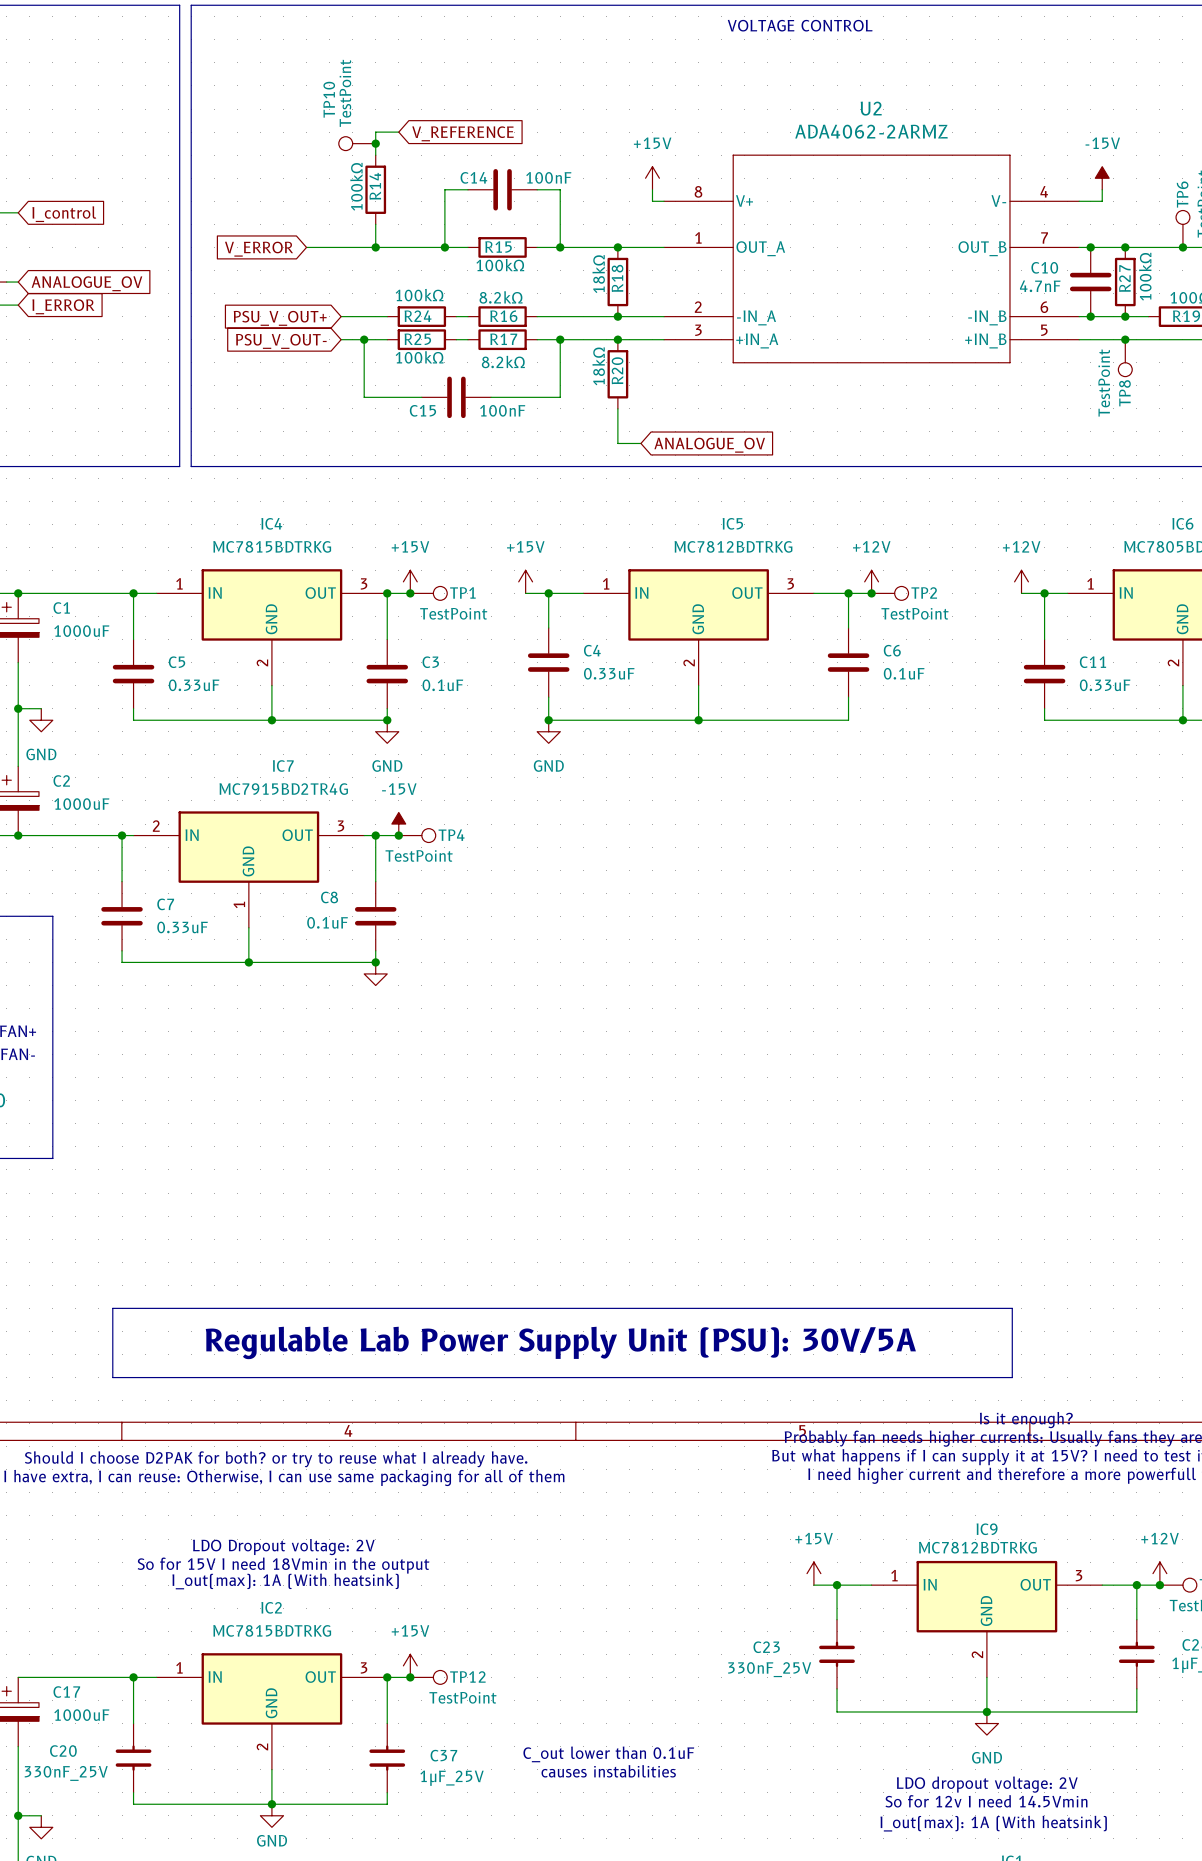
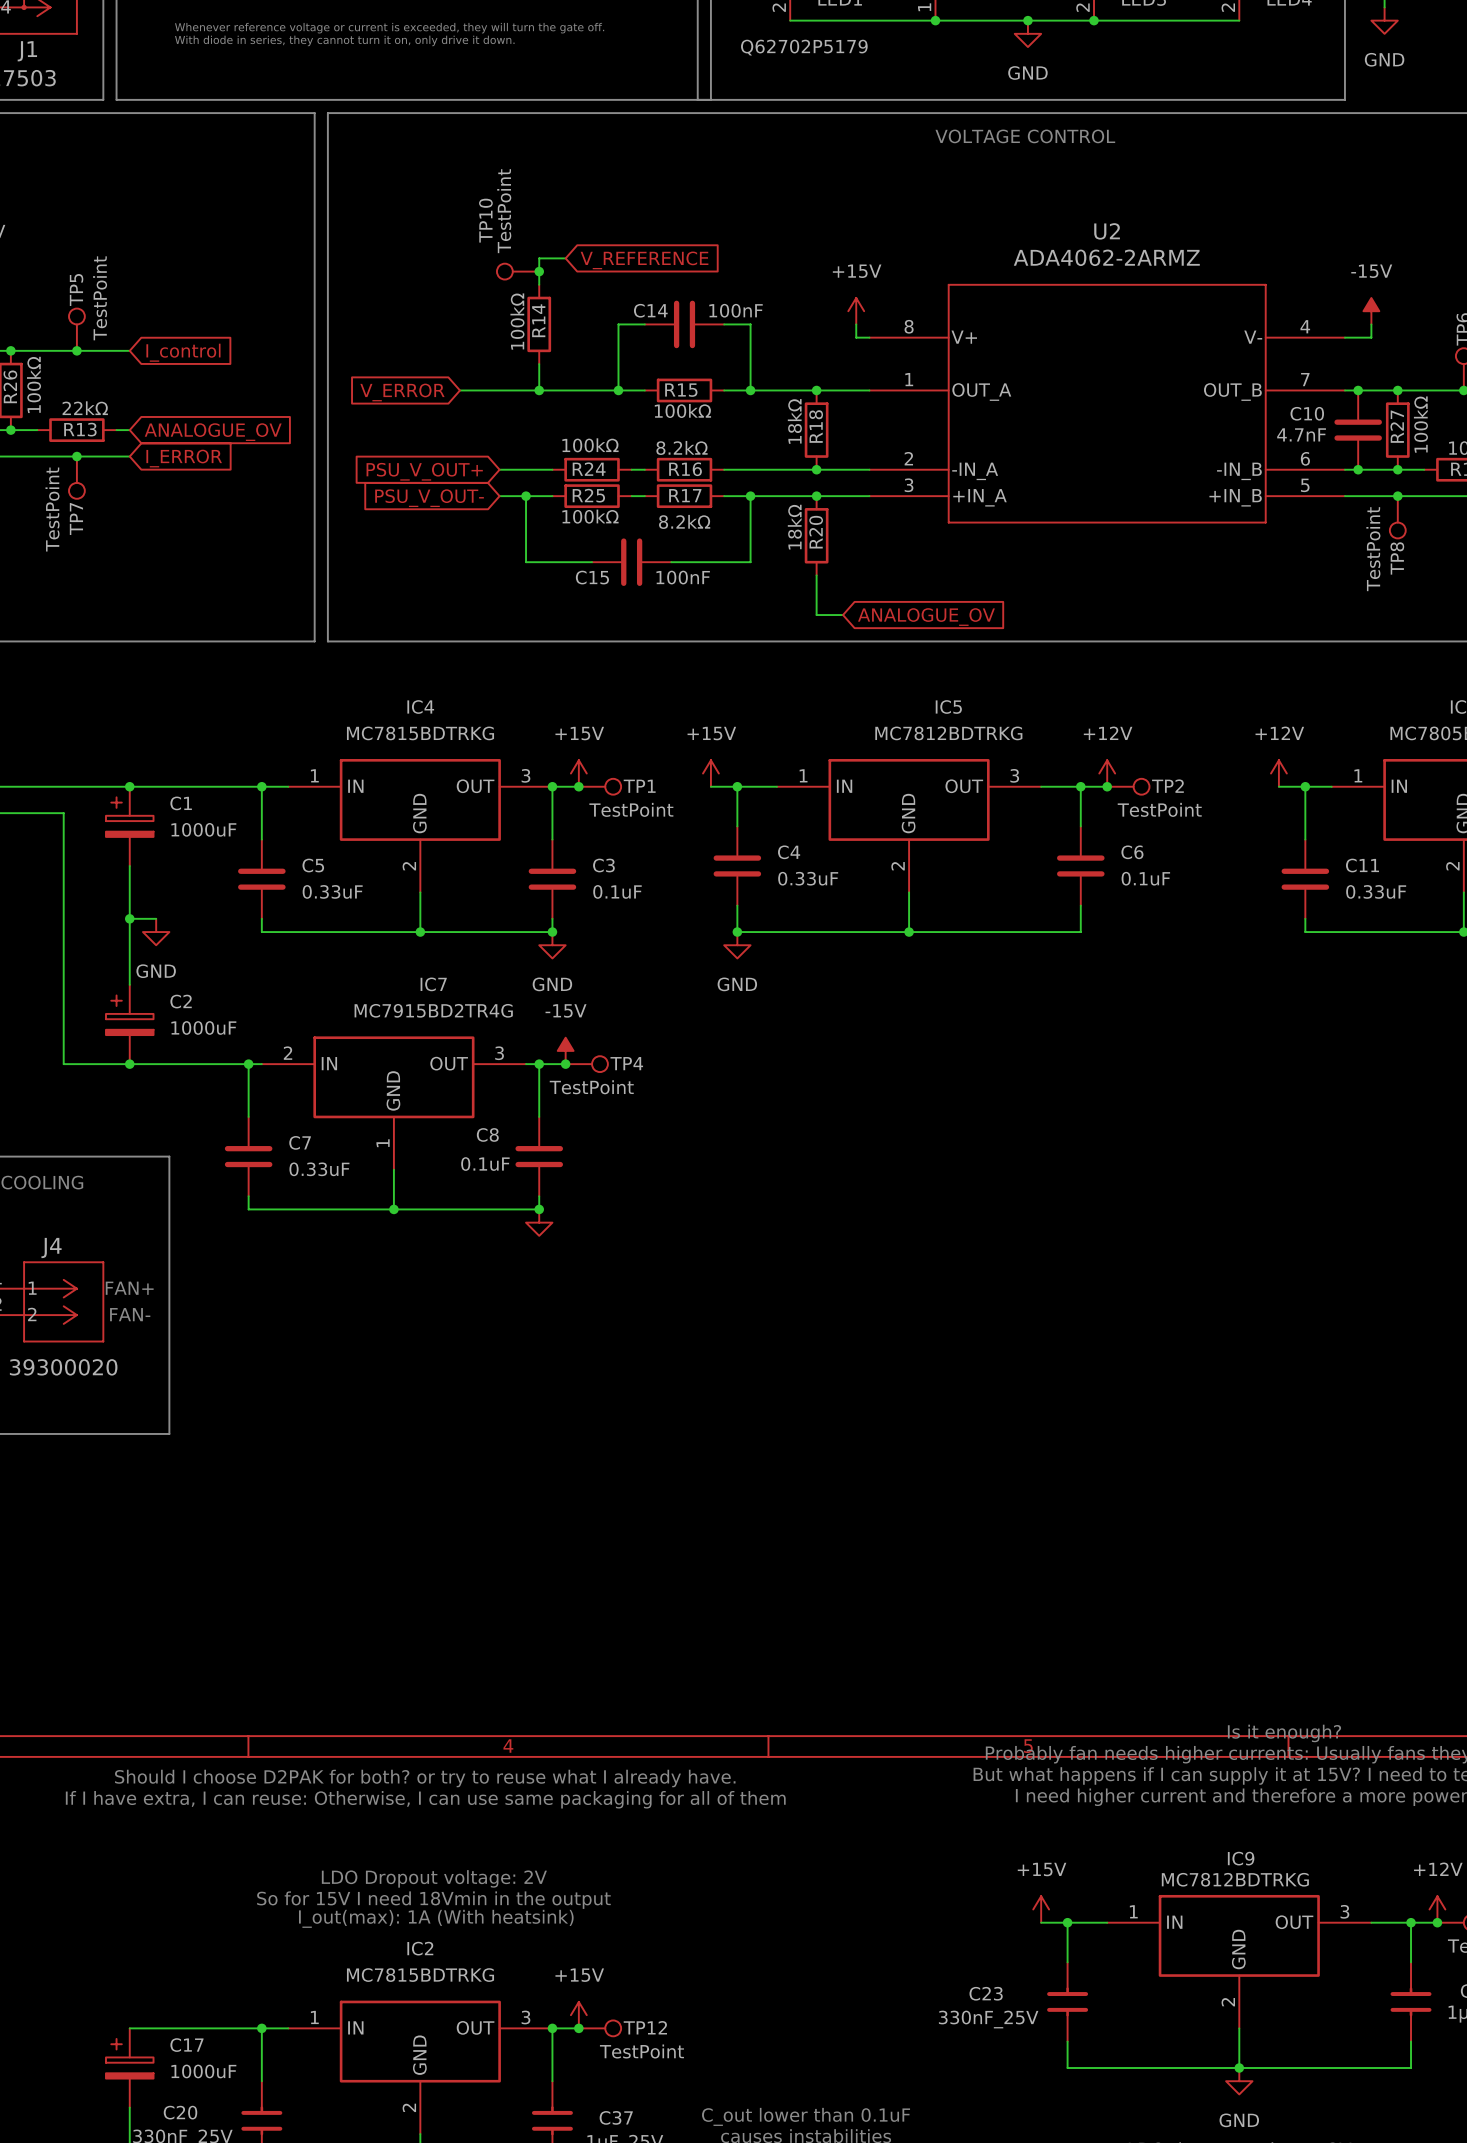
line: (112, 1308) (1012, 1308) (1012, 1377) (112, 1377) (112, 1308) -> none
text: Regulable Lab Power Supply Unit (PSU): 30V/5A (560, 1342) -> none

